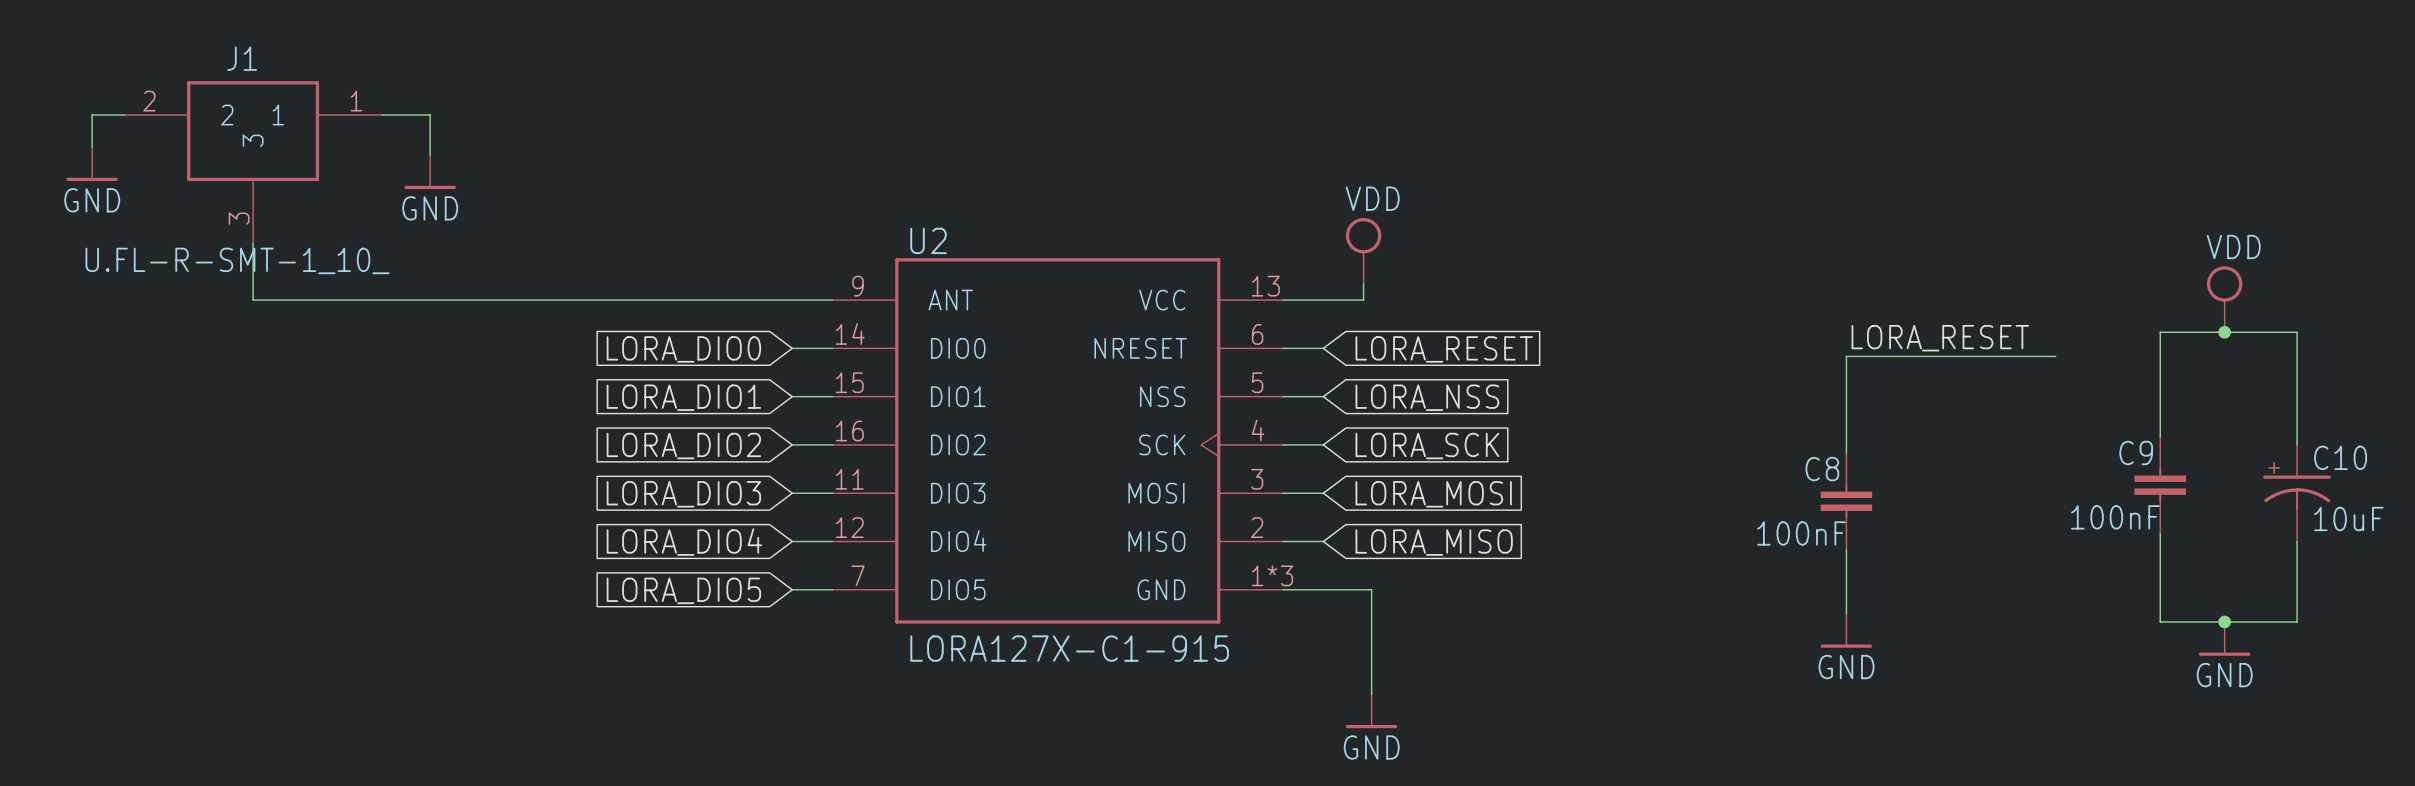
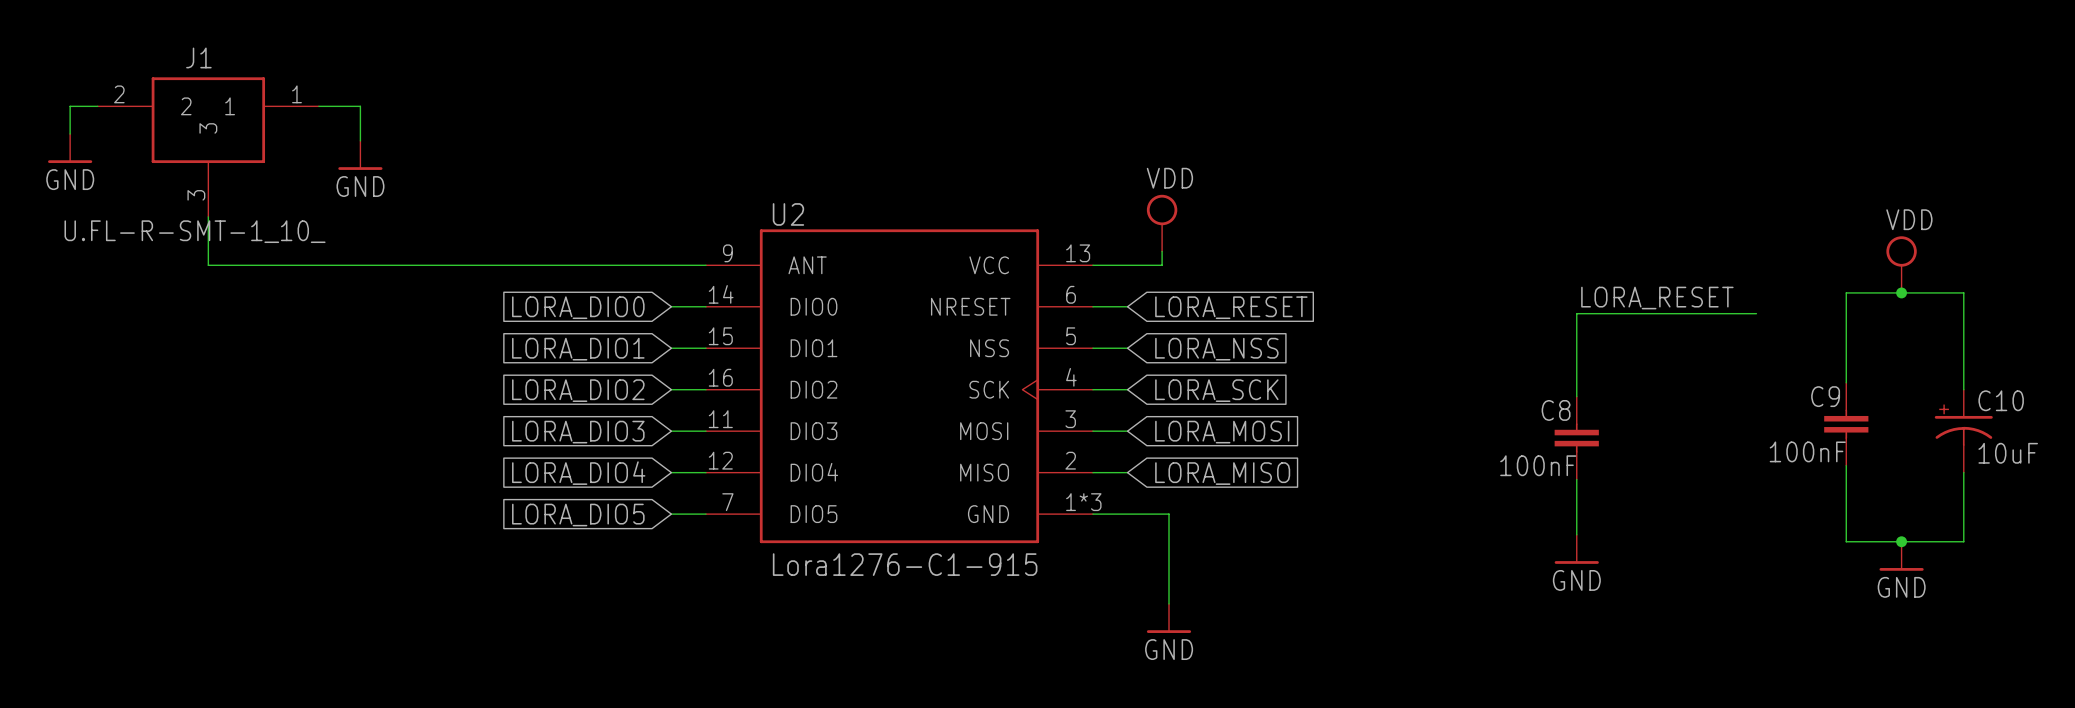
U2 value: LORA127X-C1-915 (1069, 648) -> Lora1276-C1-915 (905, 564)

